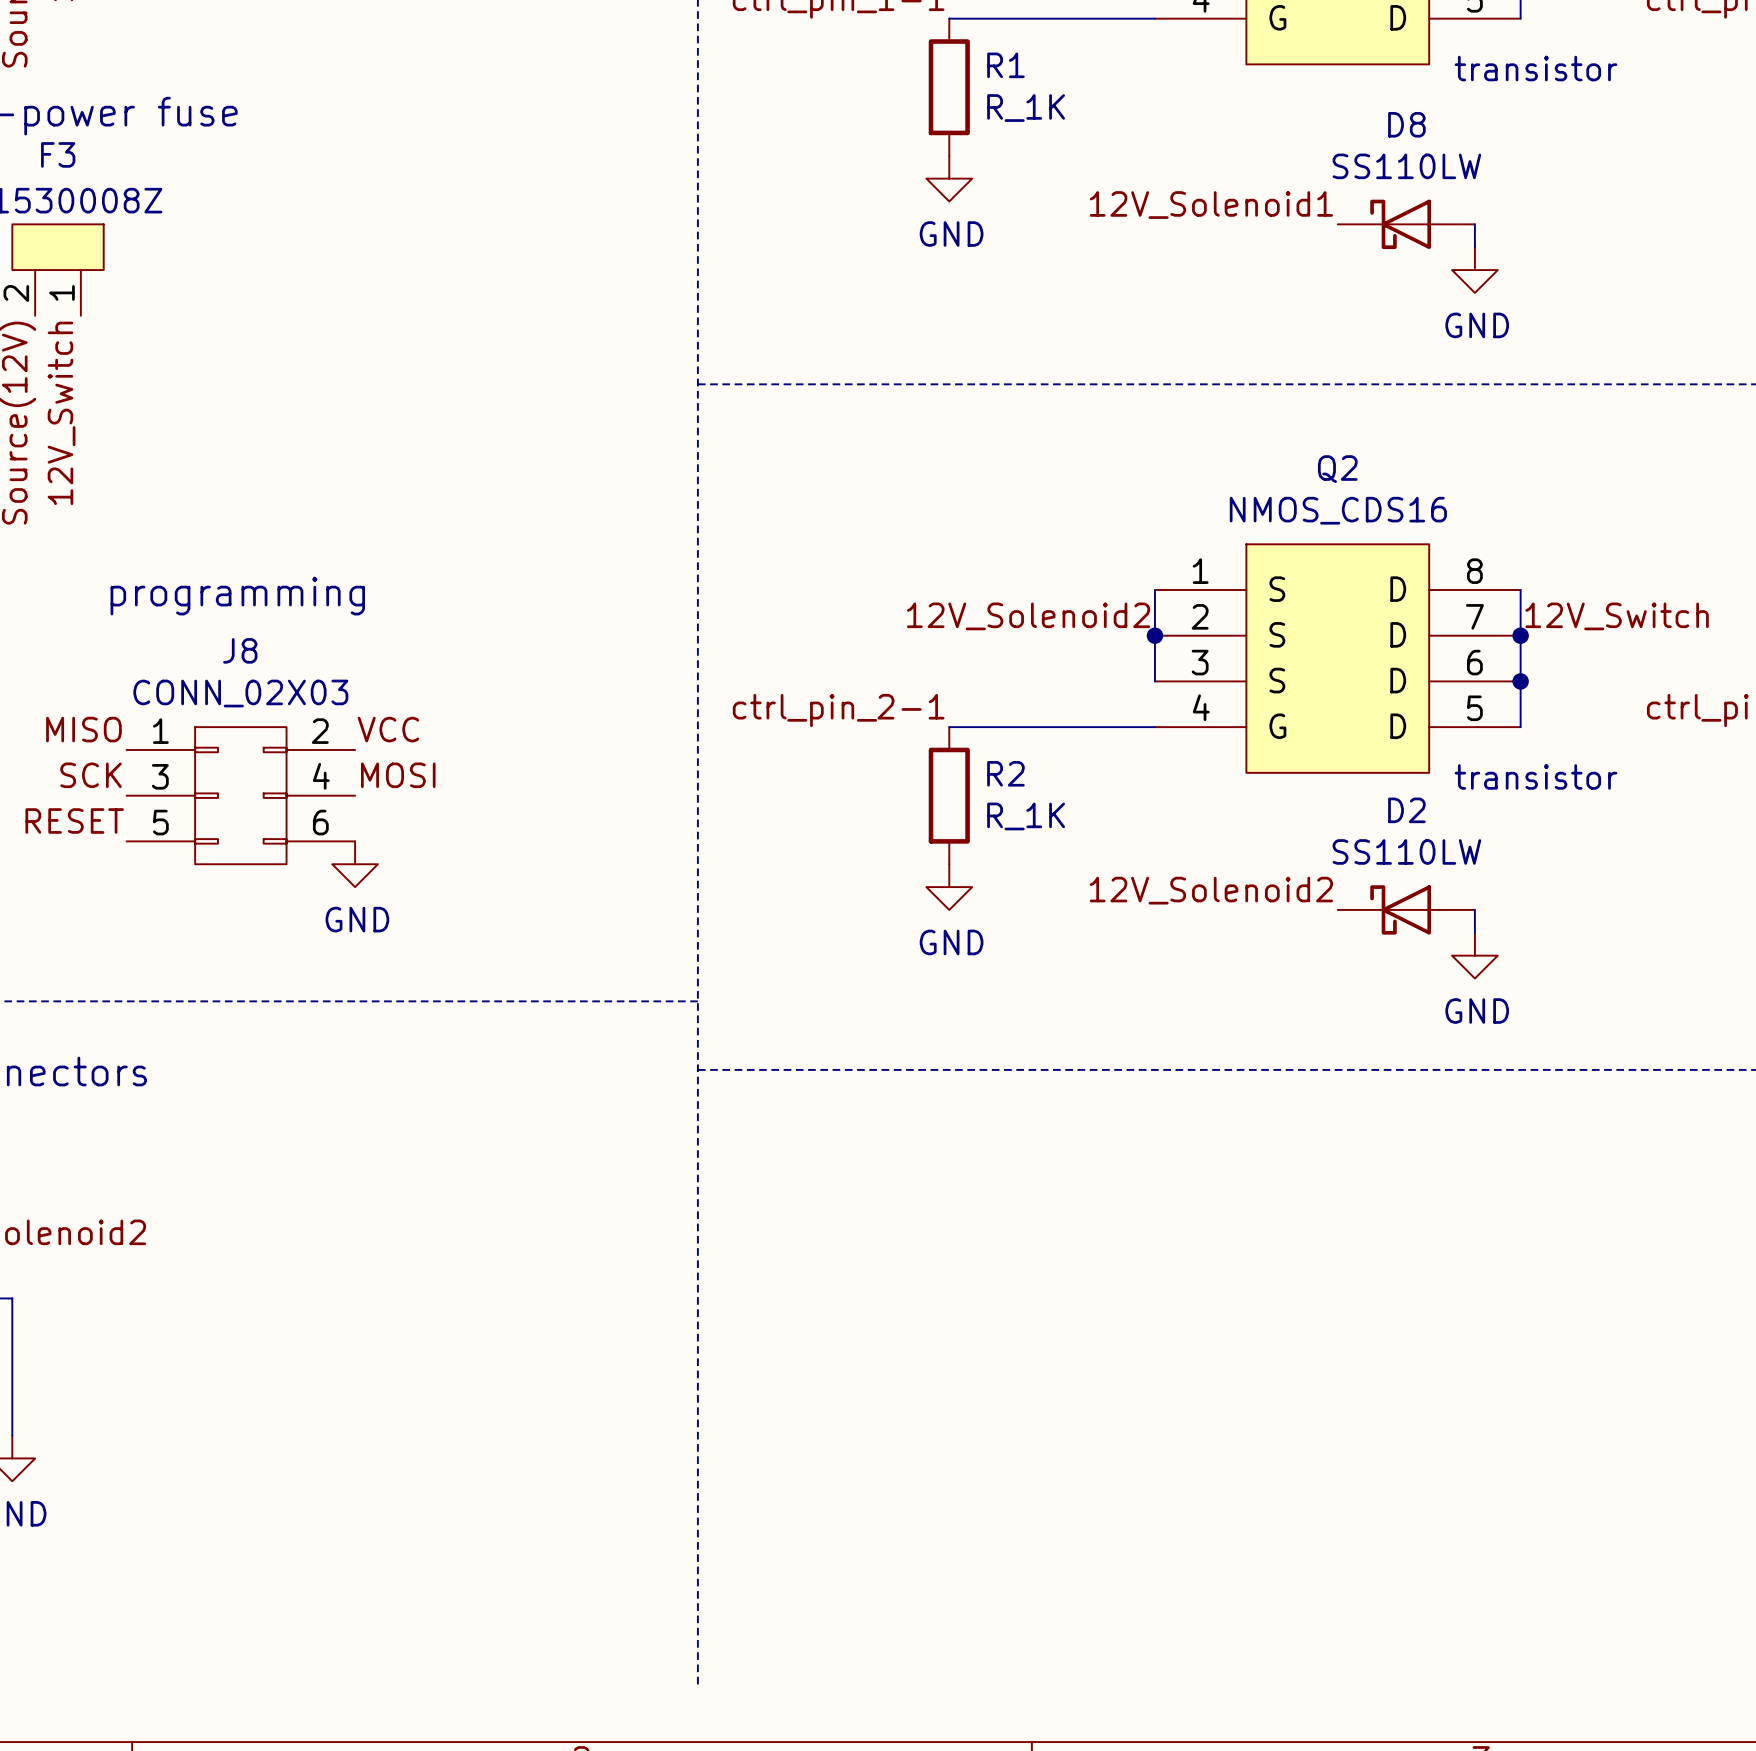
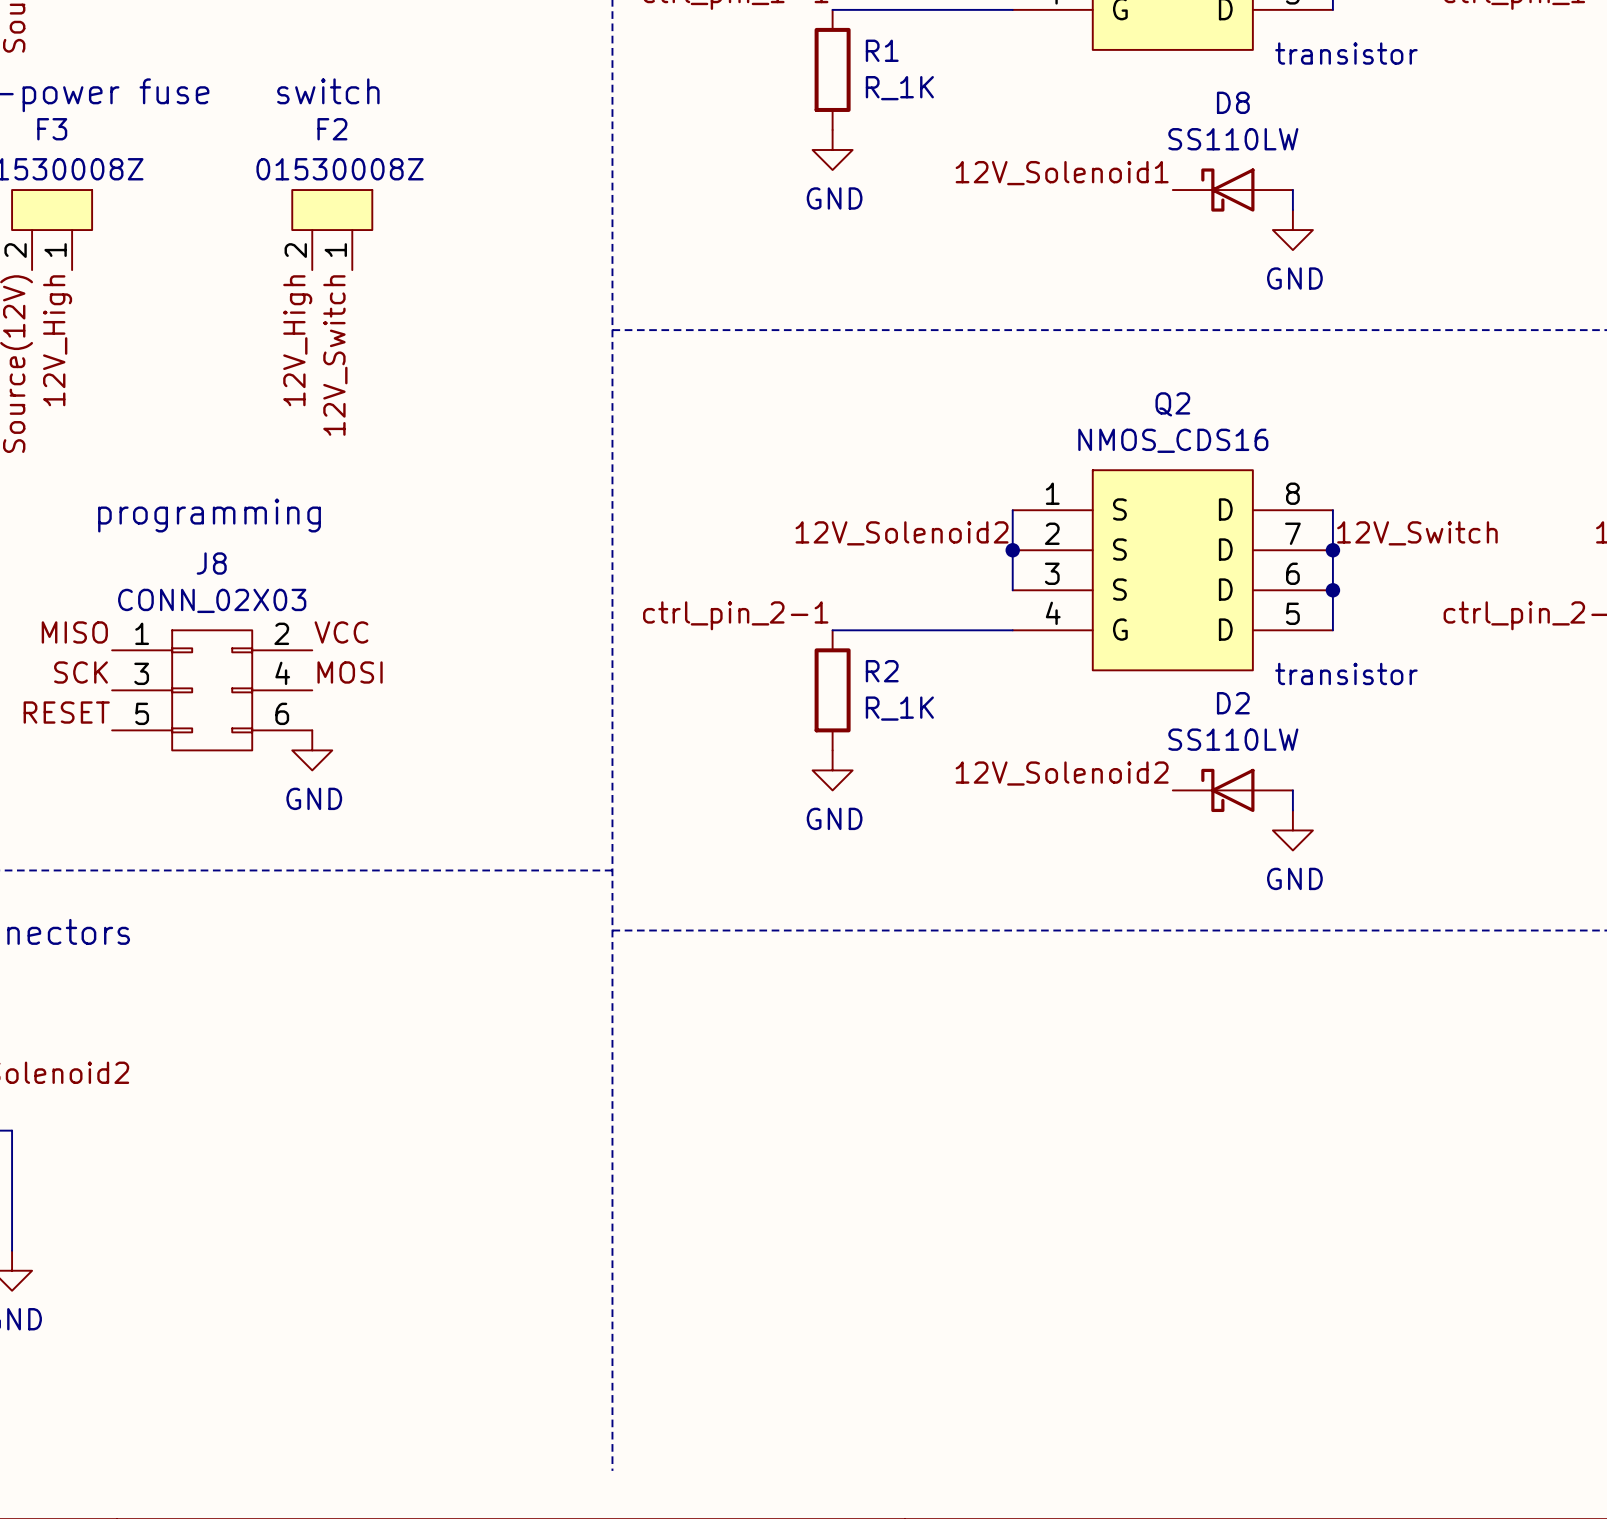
text: none -> switch (328, 91)
F2: none -> 01530008Z (332, 230)
label: none -> 12V_High (297, 340)
label: 12V_Switch (61, 413) -> 12V_High (57, 340)
label: none -> 12V_Switch (335, 355)

